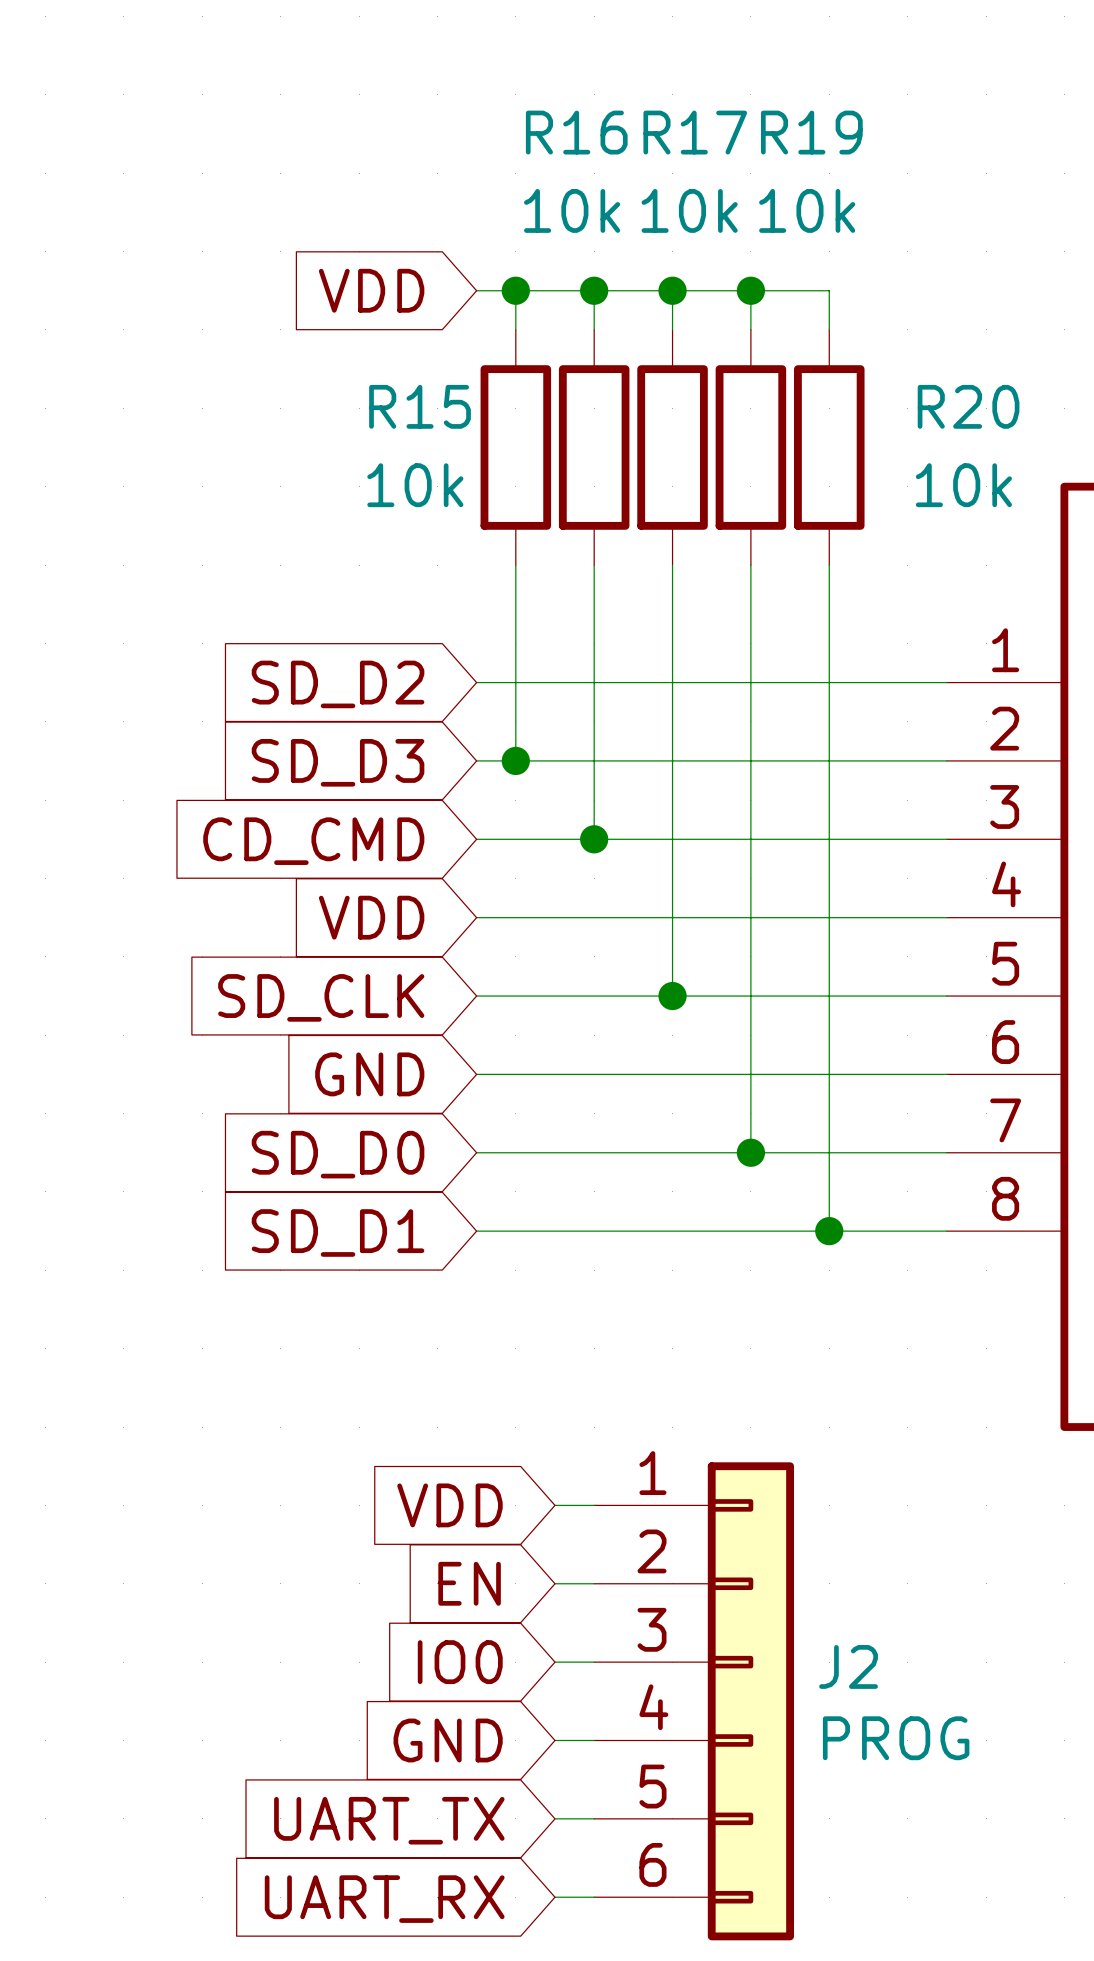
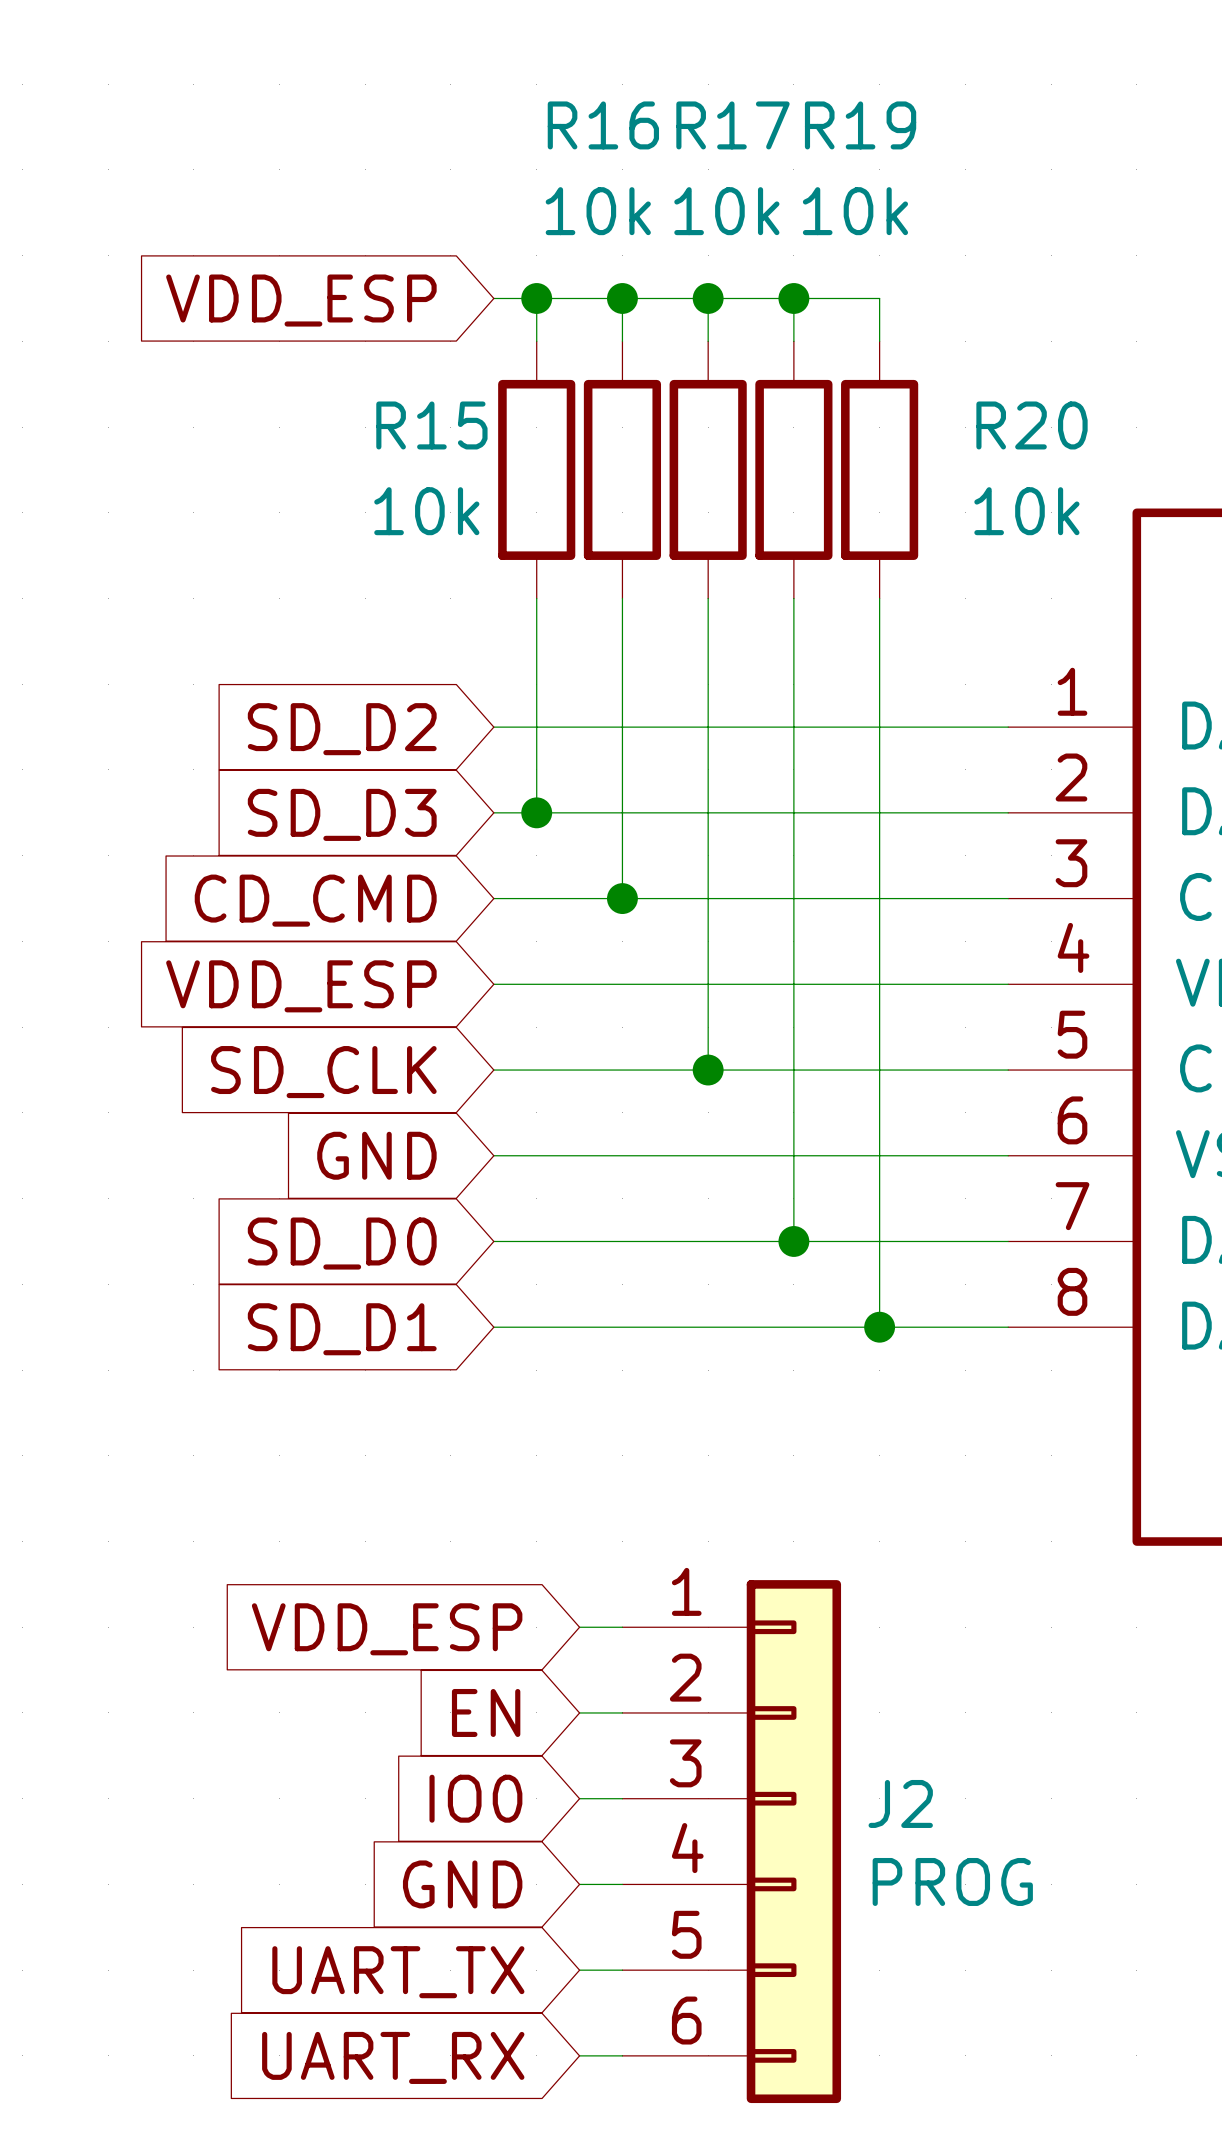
global label: VDD (371, 290) -> VDD_ESP (301, 300)
global label: VDD (371, 917) -> VDD_ESP (301, 986)
global label: VDD (449, 1505) -> VDD_ESP (387, 1629)

